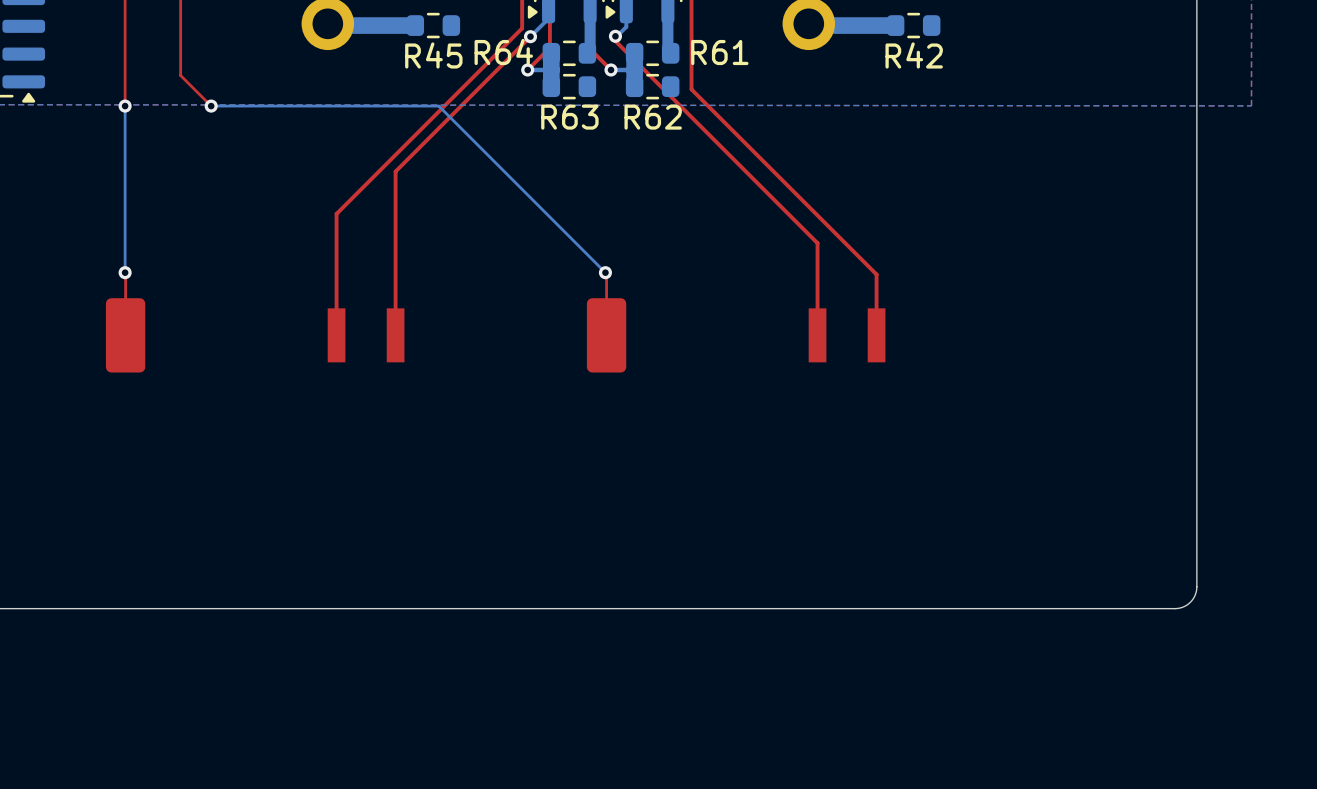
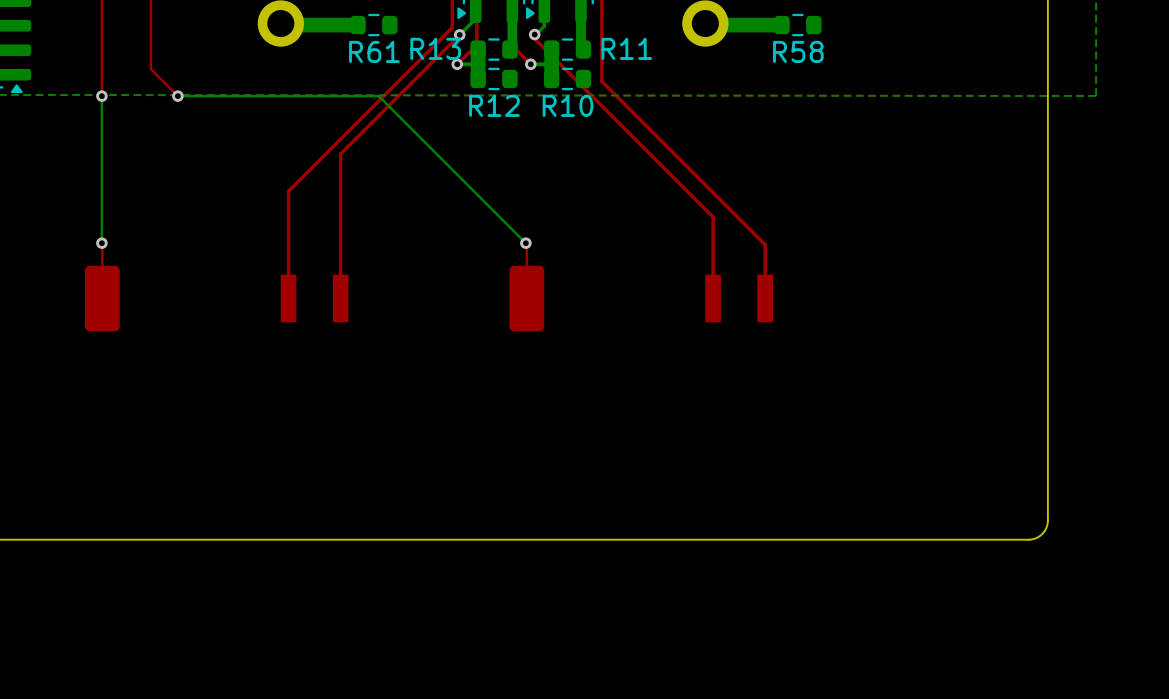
R64 name: R64 (503, 51) -> R13 (435, 48)
R61 name: R61 (719, 52) -> R11 (626, 48)
R45 name: R45 (433, 55) -> R61 (374, 51)
R42 name: R42 (914, 55) -> R58 (798, 51)
R63 name: R63 (569, 117) -> R12 (494, 105)
R62 name: R62 (653, 117) -> R10 (568, 105)

